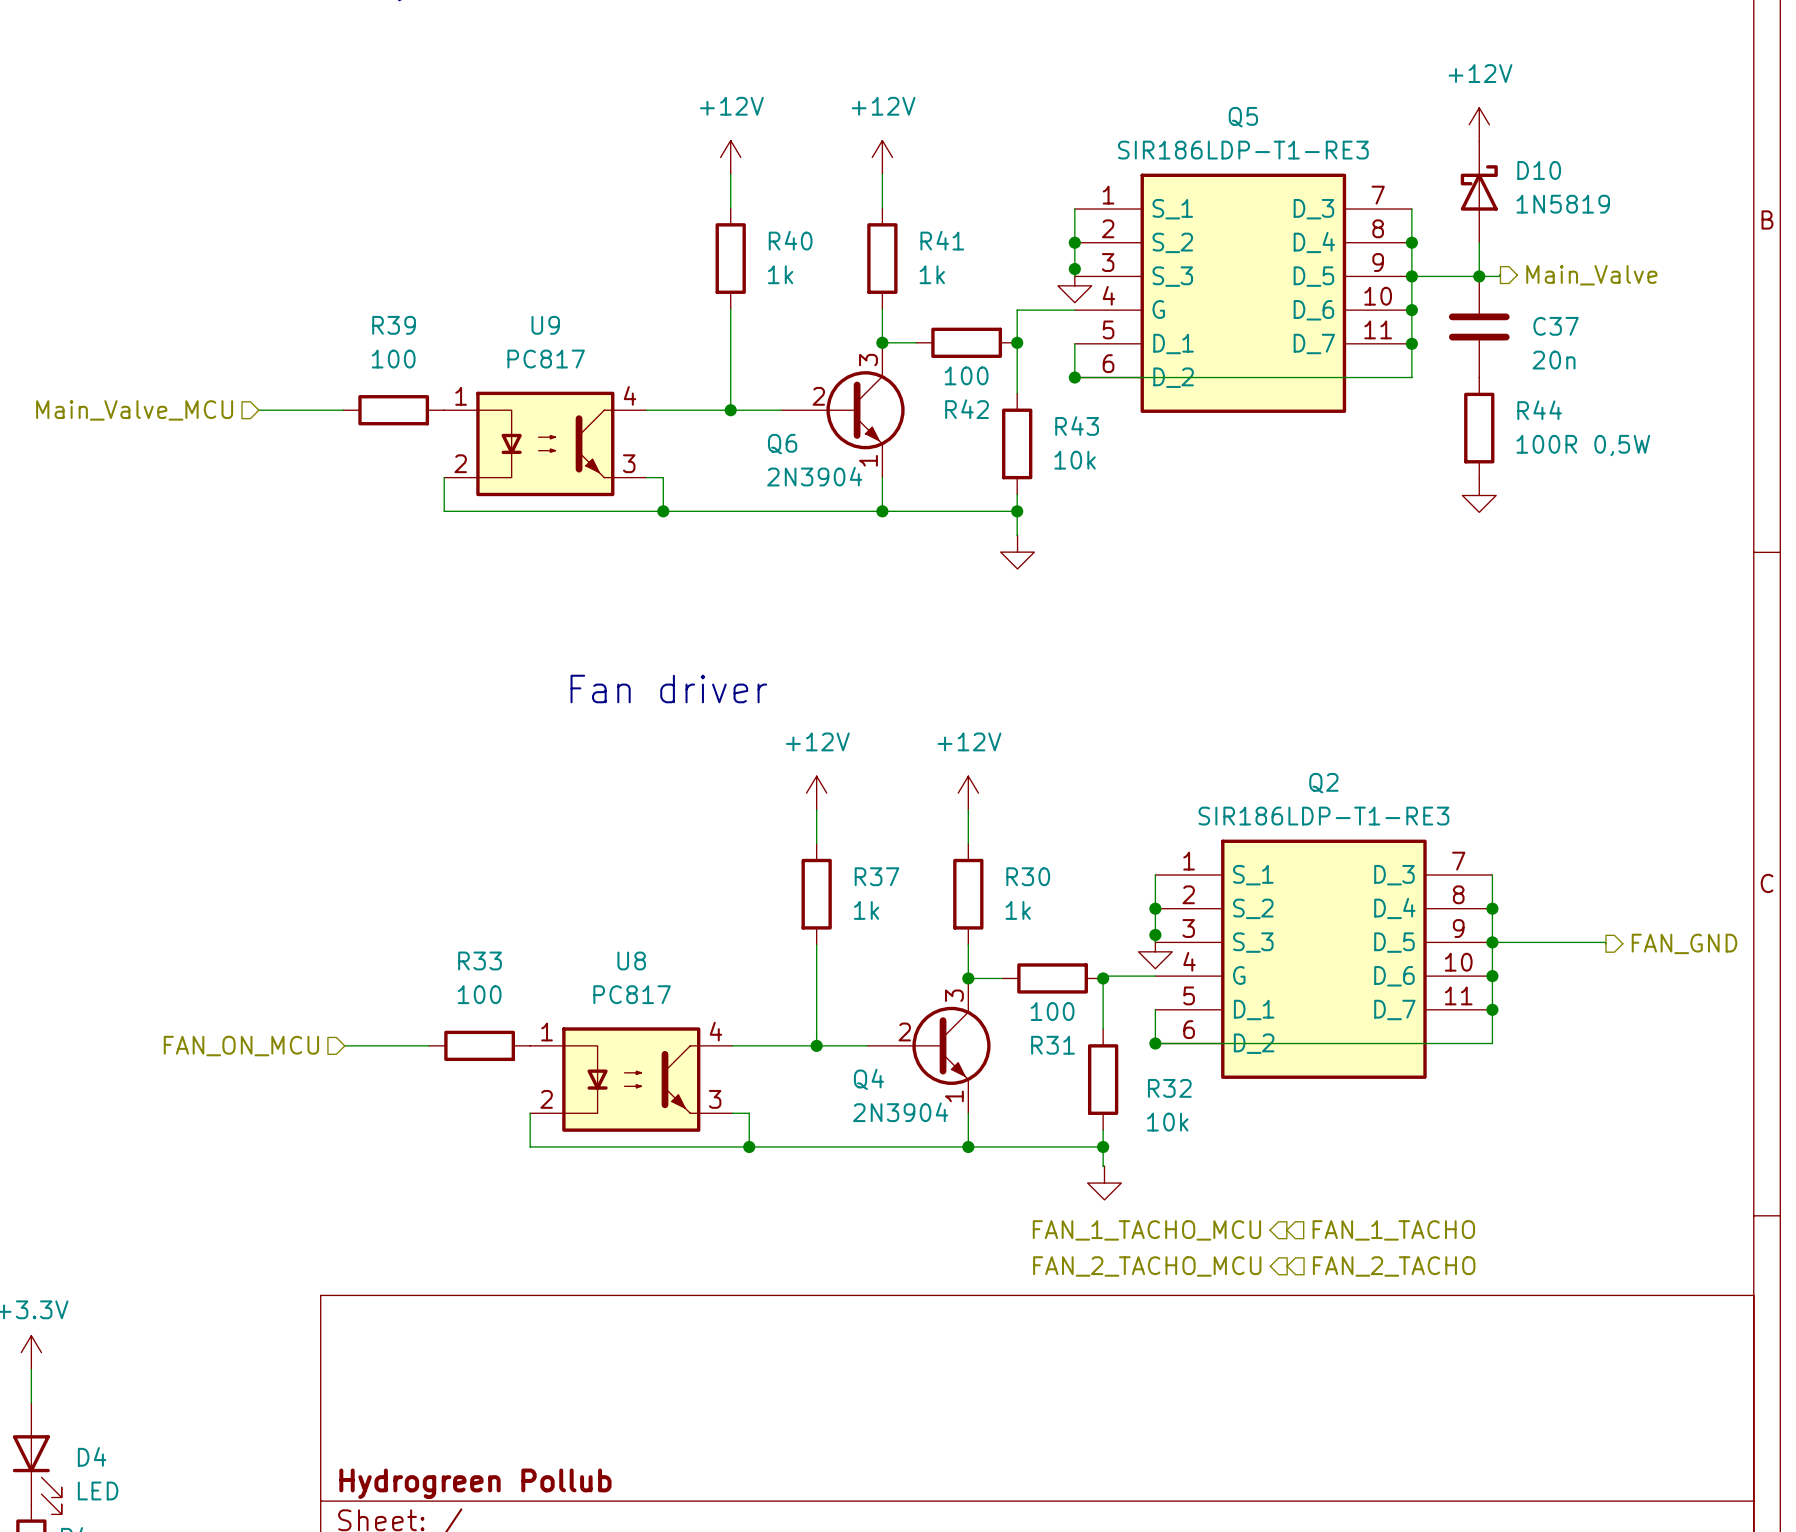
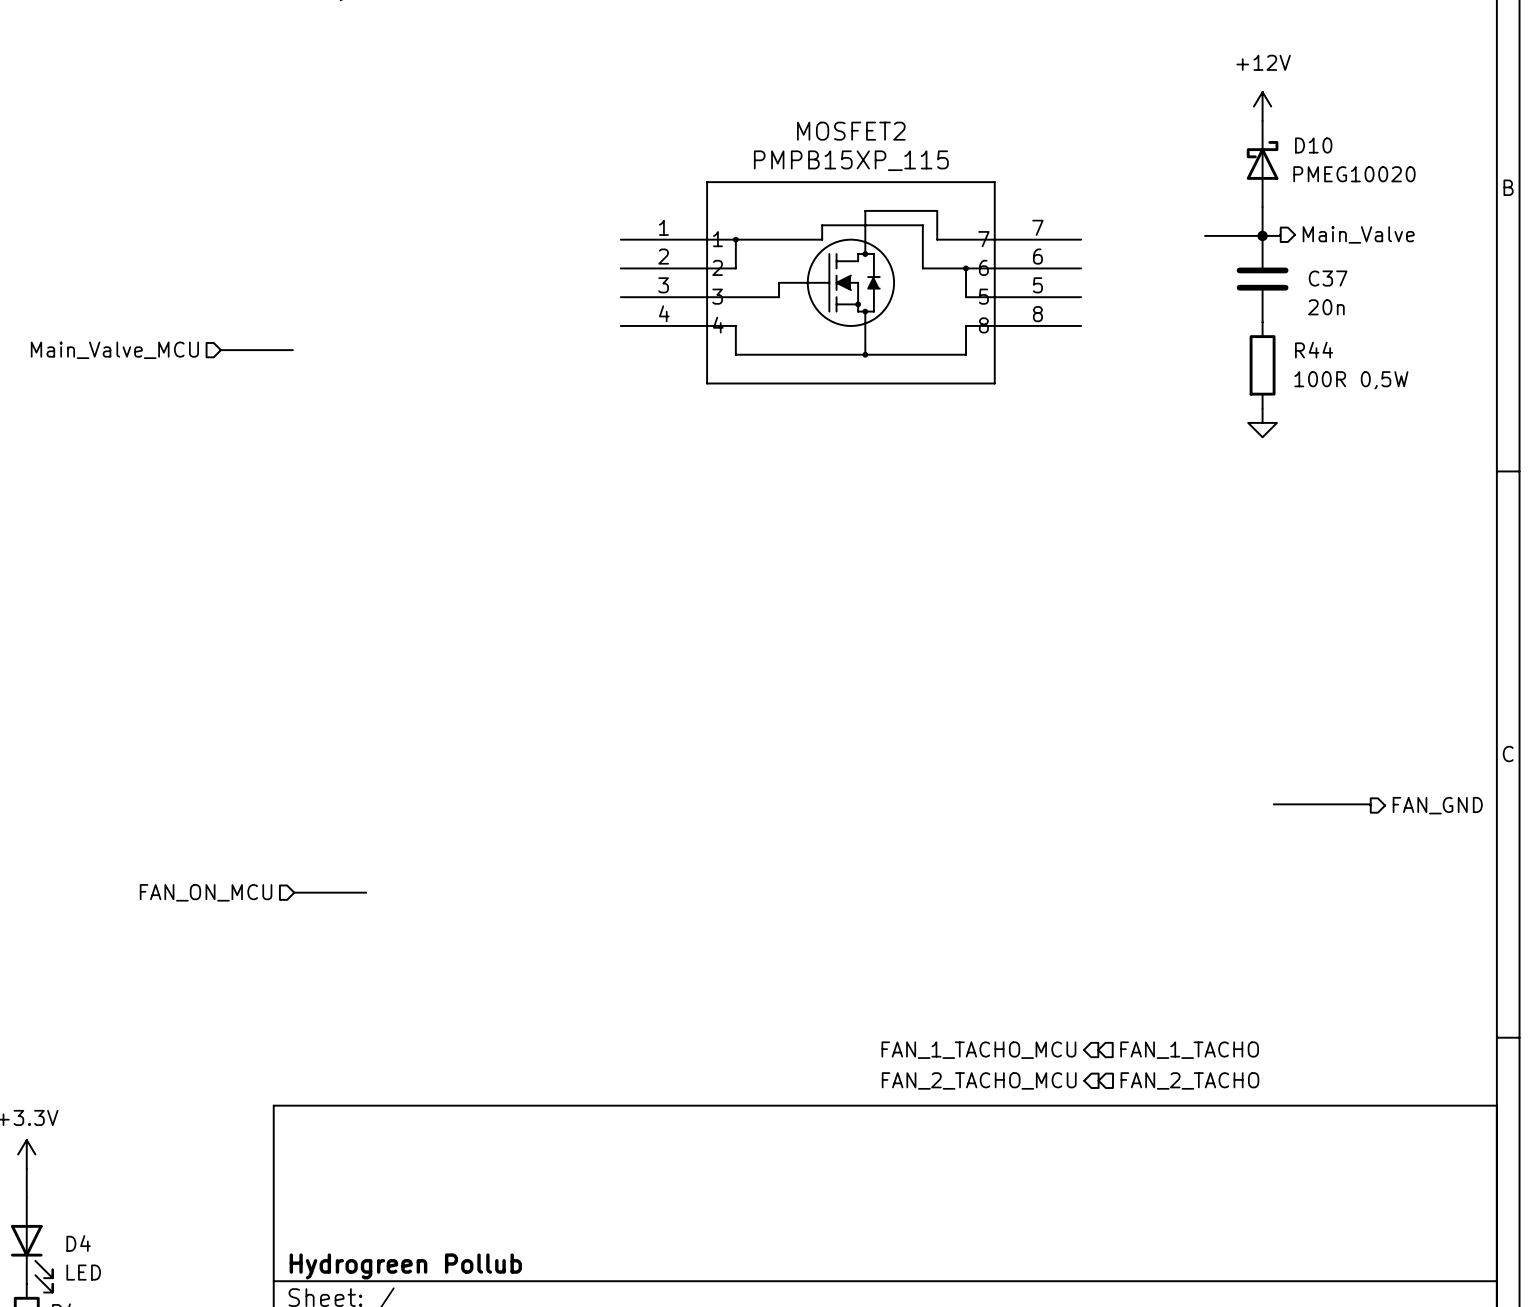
power symbol: +12V (730, 157) -> none
power symbol: +12V (882, 157) -> none
wire: (730, 174) (730, 208) -> none
wire: (882, 174) (882, 208) -> none
D10 value: 1N5819 (1563, 204) -> PMEG10020 (1354, 174)
wire: (1074, 209) (1074, 276) -> none
wire: (1411, 209) (1411, 377) (1074, 377) (1074, 343) -> none
junction: (1074, 242) -> none
junction: (1411, 242) -> none
R40: 1k (730, 258) -> none
R41: 1k (882, 258) -> none
junction: (1074, 269) -> none
junction: (1411, 276) -> none
power symbol: (1074, 285) -> none
Q5: SIR186LDP-T1-RE3 (1243, 293) -> none
wire: (730, 309) (730, 410) -> none
wire: (882, 309) (882, 342) (916, 342) -> none
wire: (1074, 310) (1017, 310) (1017, 393) -> none
junction: (1411, 310) -> none
MOSFET2: none -> PMPB15XP_115 (850, 282)
junction: (882, 342) -> none
R42: 100 (966, 342) -> none
junction: (1017, 342) -> none
junction: (1411, 343) -> none
junction: (1074, 377) -> none
R39: 100 (393, 410) -> none
wire: (646, 410) (781, 410) -> none
junction: (730, 410) -> none
Q6: 2N3904 (842, 410) -> none
U9: PC817 (545, 443) -> none
R43: 10k (1017, 443) -> none
wire: (444, 477) (444, 511) (1017, 511) -> none
wire: (646, 477) (663, 477) (663, 511) -> none
wire: (882, 477) (882, 511) -> none
wire: (1017, 494) (1017, 535) -> none
junction: (663, 511) -> none
junction: (882, 511) -> none
junction: (1017, 511) -> none
power symbol: (1017, 552) -> none
text: Fan driver (668, 689) -> none
power symbol: +12V (816, 793) -> none
power symbol: +12V (968, 793) -> none
wire: (816, 809) (816, 843) -> none
wire: (968, 809) (968, 843) -> none
wire: (1155, 875) (1155, 942) -> none
wire: (1492, 875) (1492, 1043) (1155, 1043) (1155, 1009) -> none
R37: 1k (816, 894) -> none
R30: 1k (968, 894) -> none
junction: (1155, 908) -> none
junction: (1492, 908) -> none
junction: (1155, 934) -> none
junction: (1492, 942) -> none
wire: (816, 944) (816, 1045) -> none
wire: (968, 944) (968, 978) (1002, 978) -> none
power symbol: (1155, 951) -> none
Q2: SIR186LDP-T1-RE3 (1323, 959) -> none
wire: (1155, 976) (1103, 976) (1103, 1029) -> none
junction: (1492, 976) -> none
junction: (968, 978) -> none
R31: 100 (1052, 978) -> none
junction: (1103, 978) -> none
junction: (1492, 1009) -> none
junction: (1155, 1043) -> none
R33: 100 (479, 1045) -> none
wire: (732, 1045) (867, 1045) -> none
junction: (816, 1045) -> none
Q4: 2N3904 (928, 1045) -> none
U8: PC817 (631, 1079) -> none
R32: 10k (1103, 1079) -> none
wire: (530, 1113) (530, 1146) (1103, 1146) -> none
wire: (732, 1113) (749, 1113) (749, 1146) -> none
wire: (968, 1113) (968, 1146) -> none
wire: (1103, 1130) (1104, 1166) -> none
junction: (749, 1146) -> none
junction: (968, 1146) -> none
junction: (1103, 1146) -> none
power symbol: (1104, 1183) -> none

